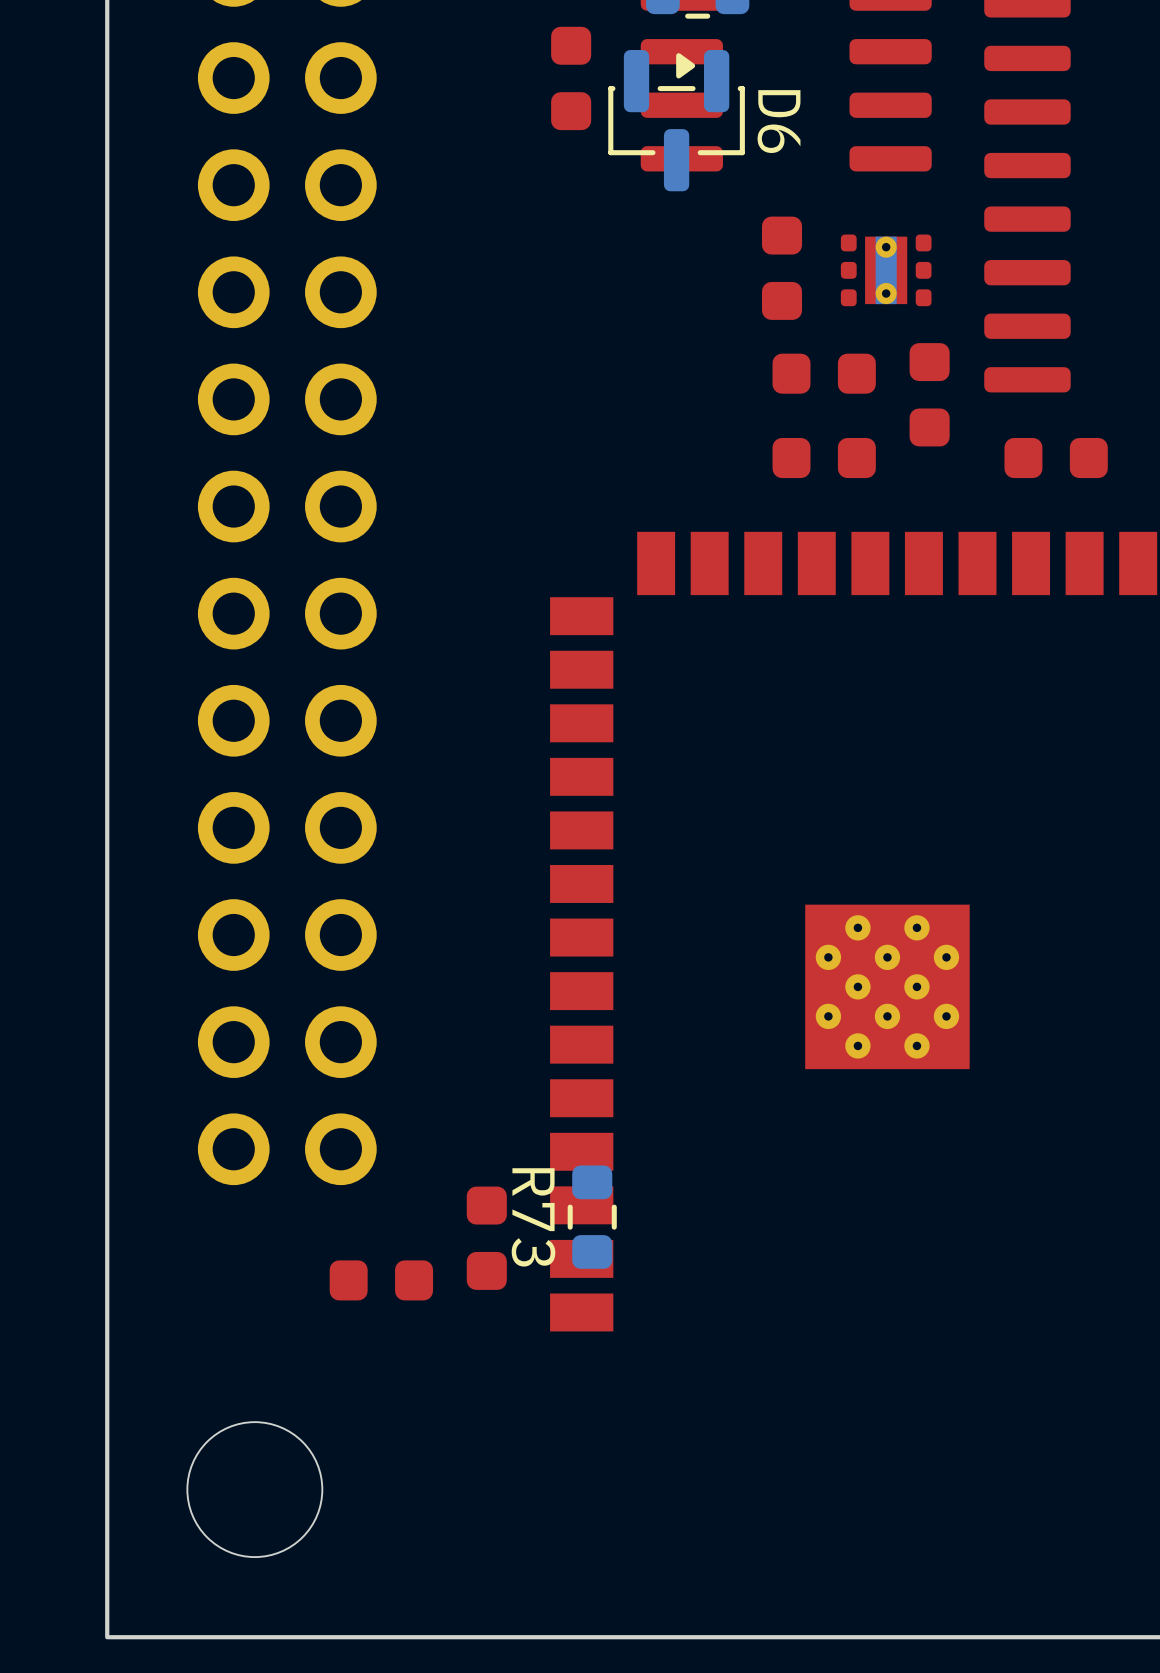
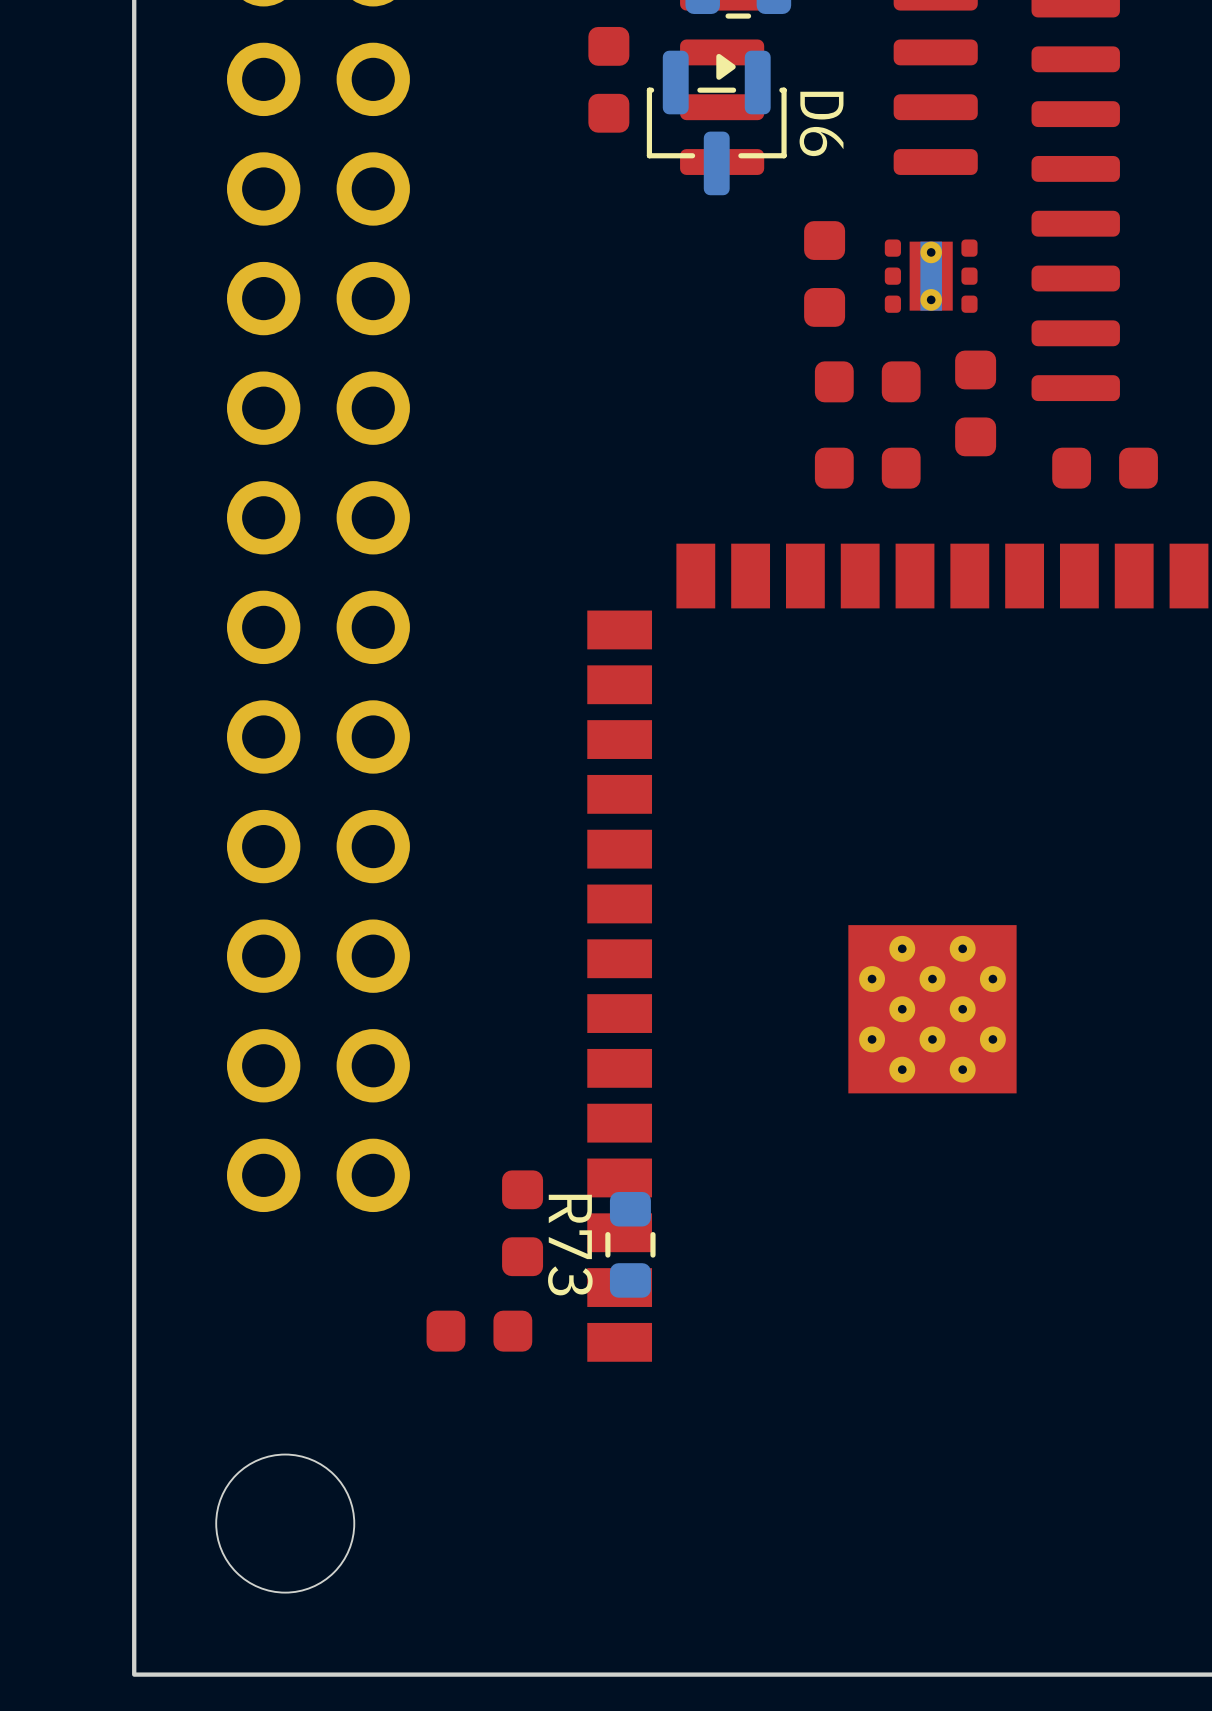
part: none -> (522, 1223)
part: (486, 1238) -> none
part: (381, 1280) -> none
part: none -> (479, 1331)

